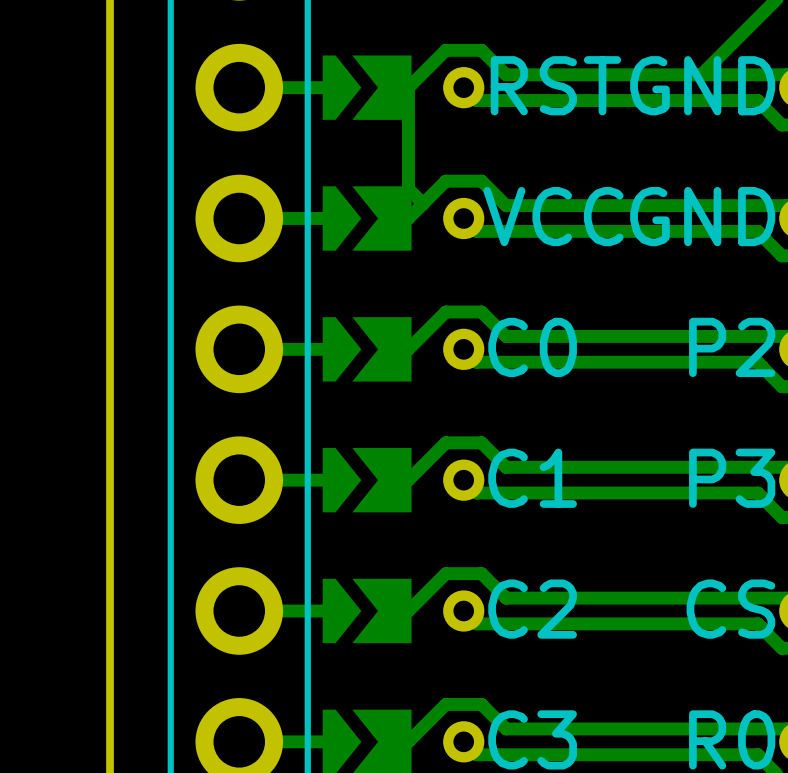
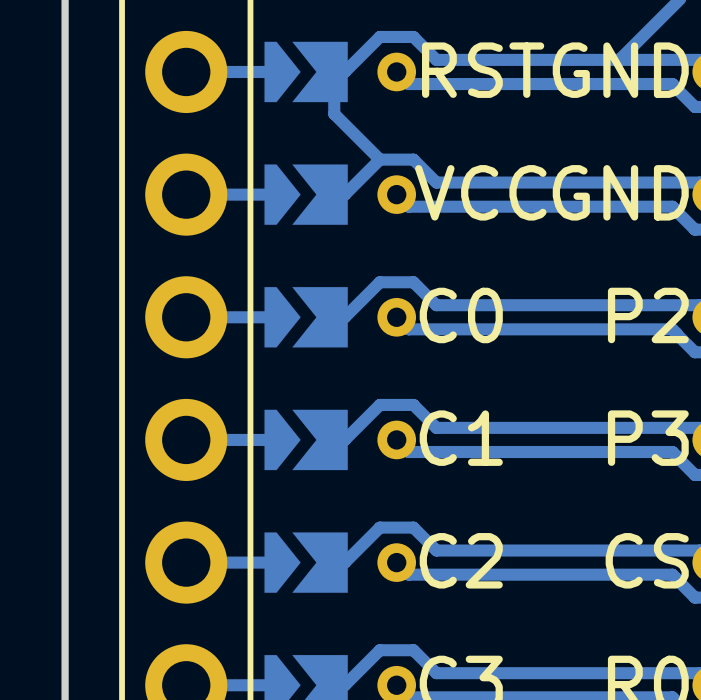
track: none -> (334, 71) (334, 113) (379, 159)
track: (408, 87) (408, 188) (423, 203) -> none

